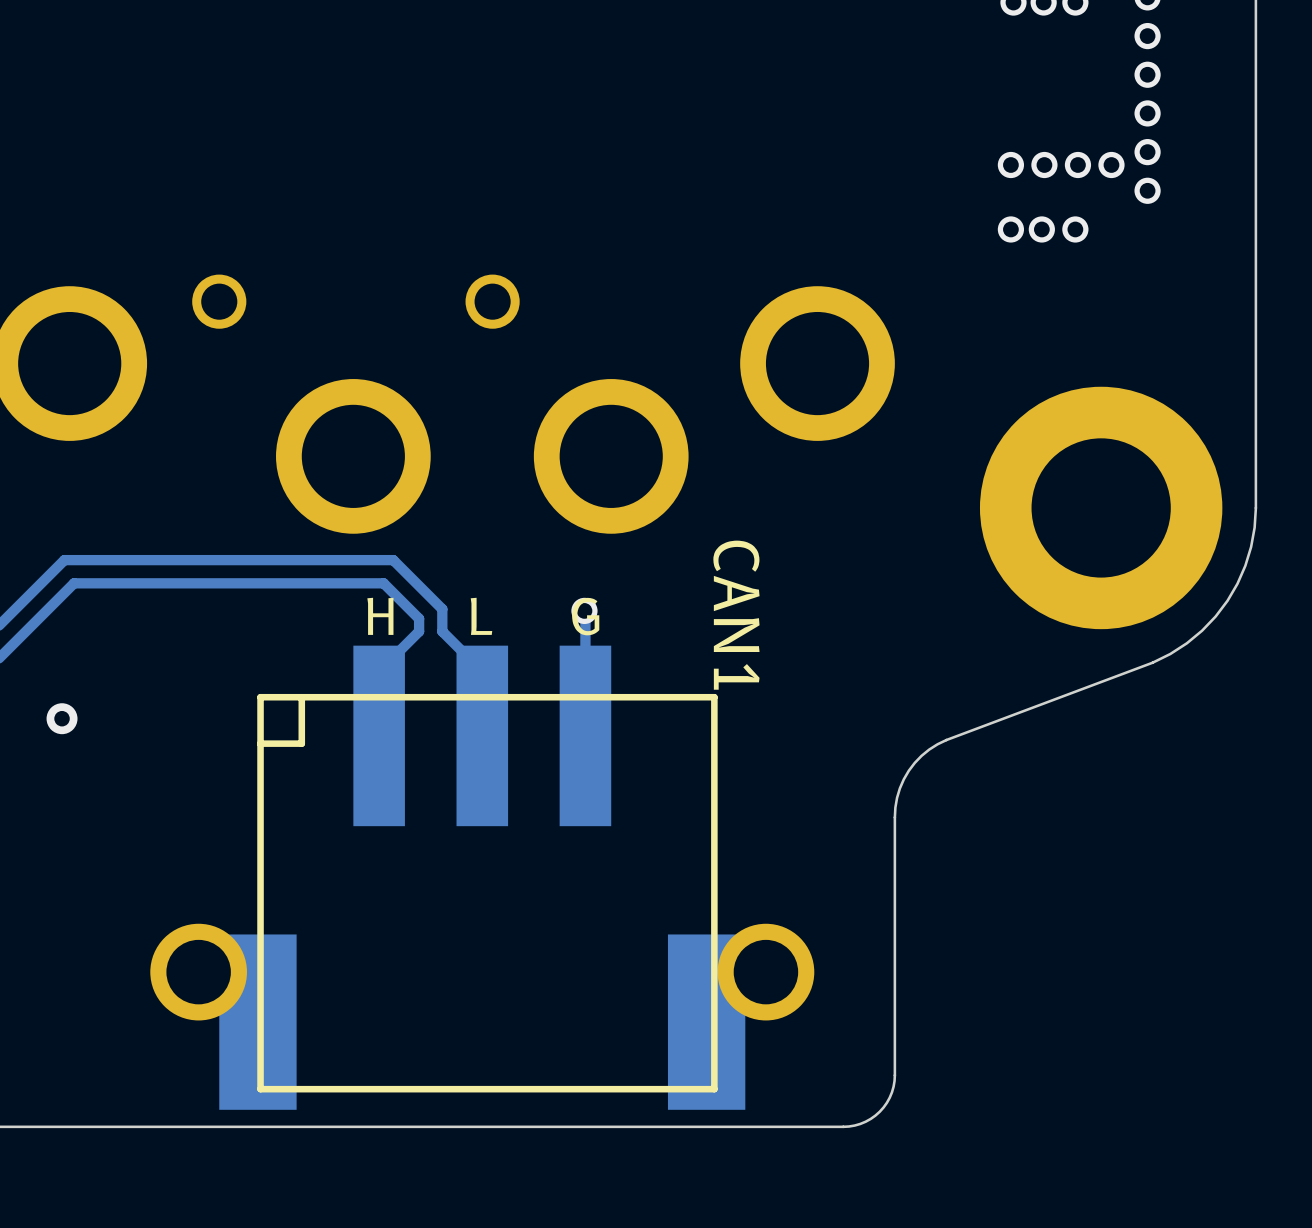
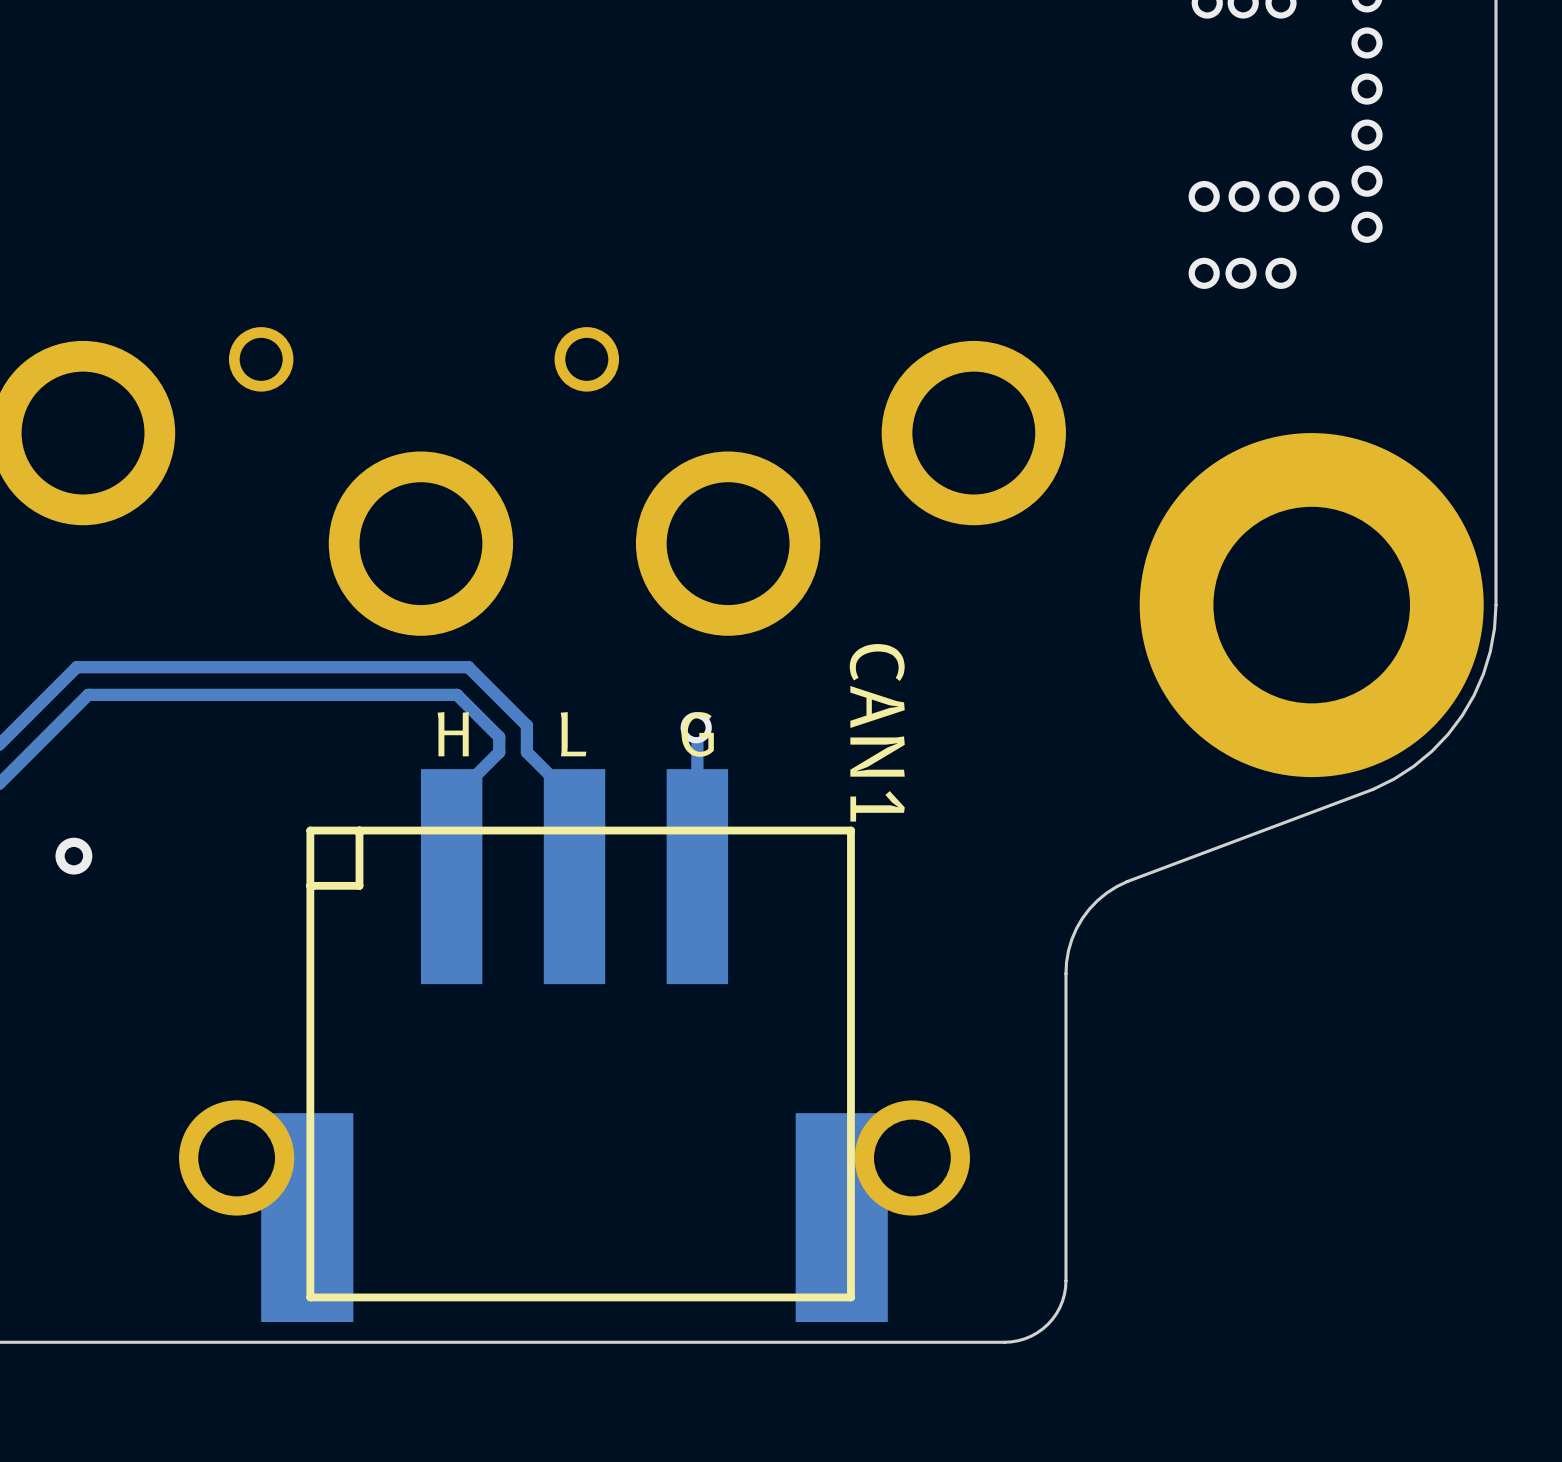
part footprint: [979, 386, 1223, 630] -> [1139, 433, 1484, 778]

